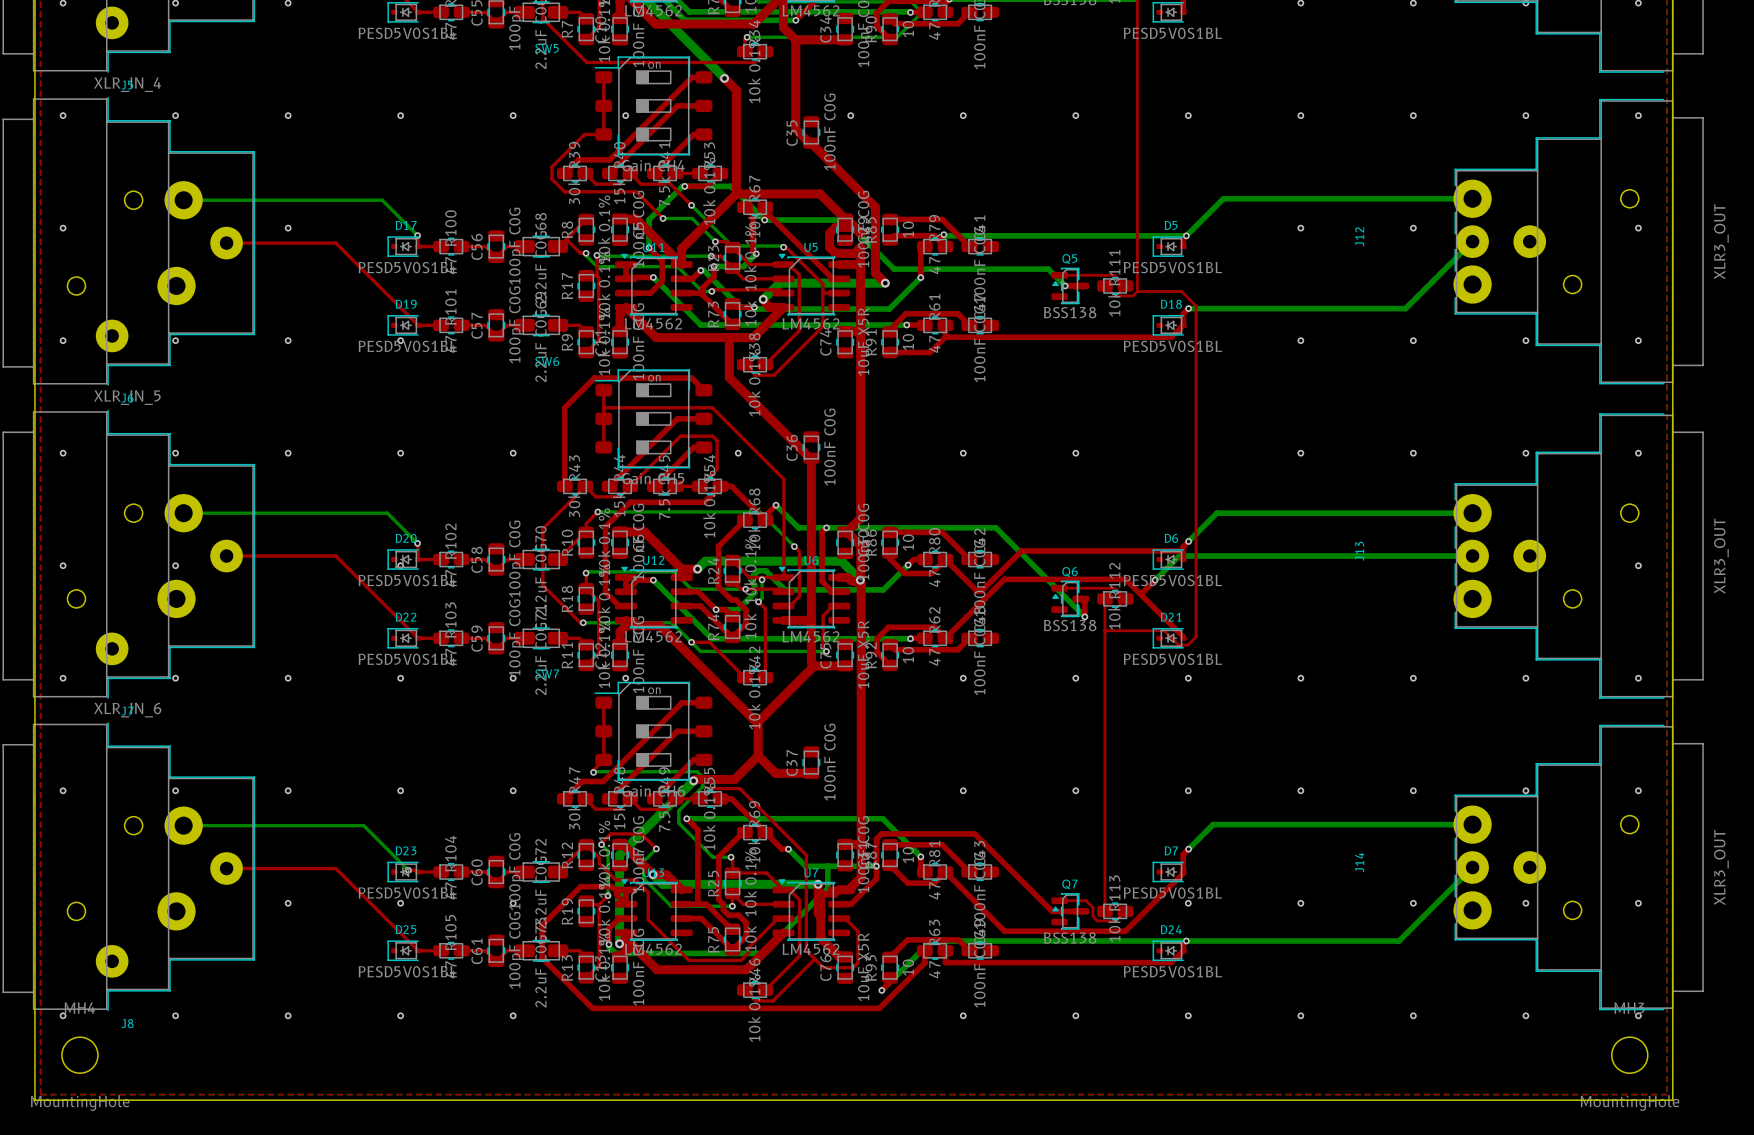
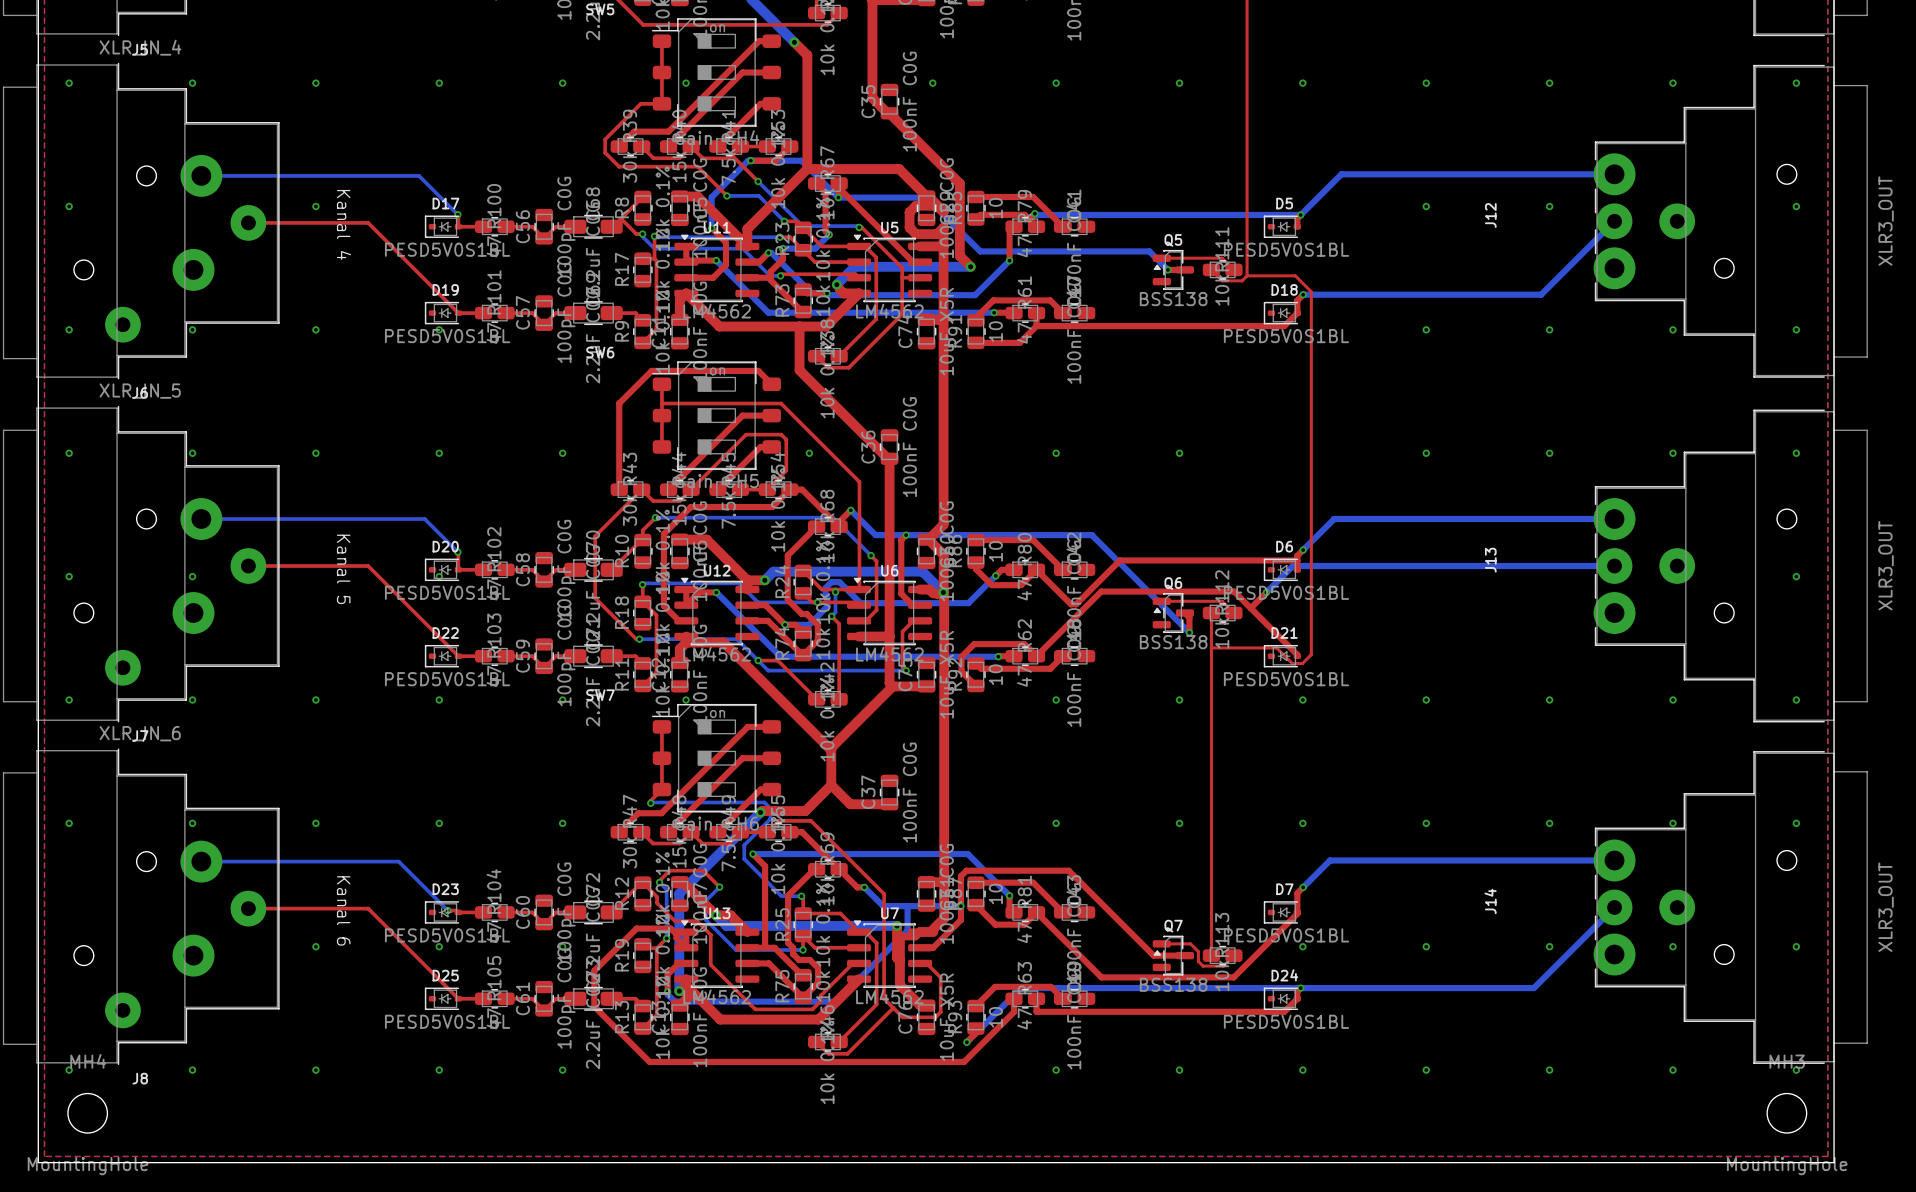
text: none -> Kanal 4 (343, 224)
text: none -> Kanal 5 (343, 569)
text: none -> Kanal 6 (343, 910)

